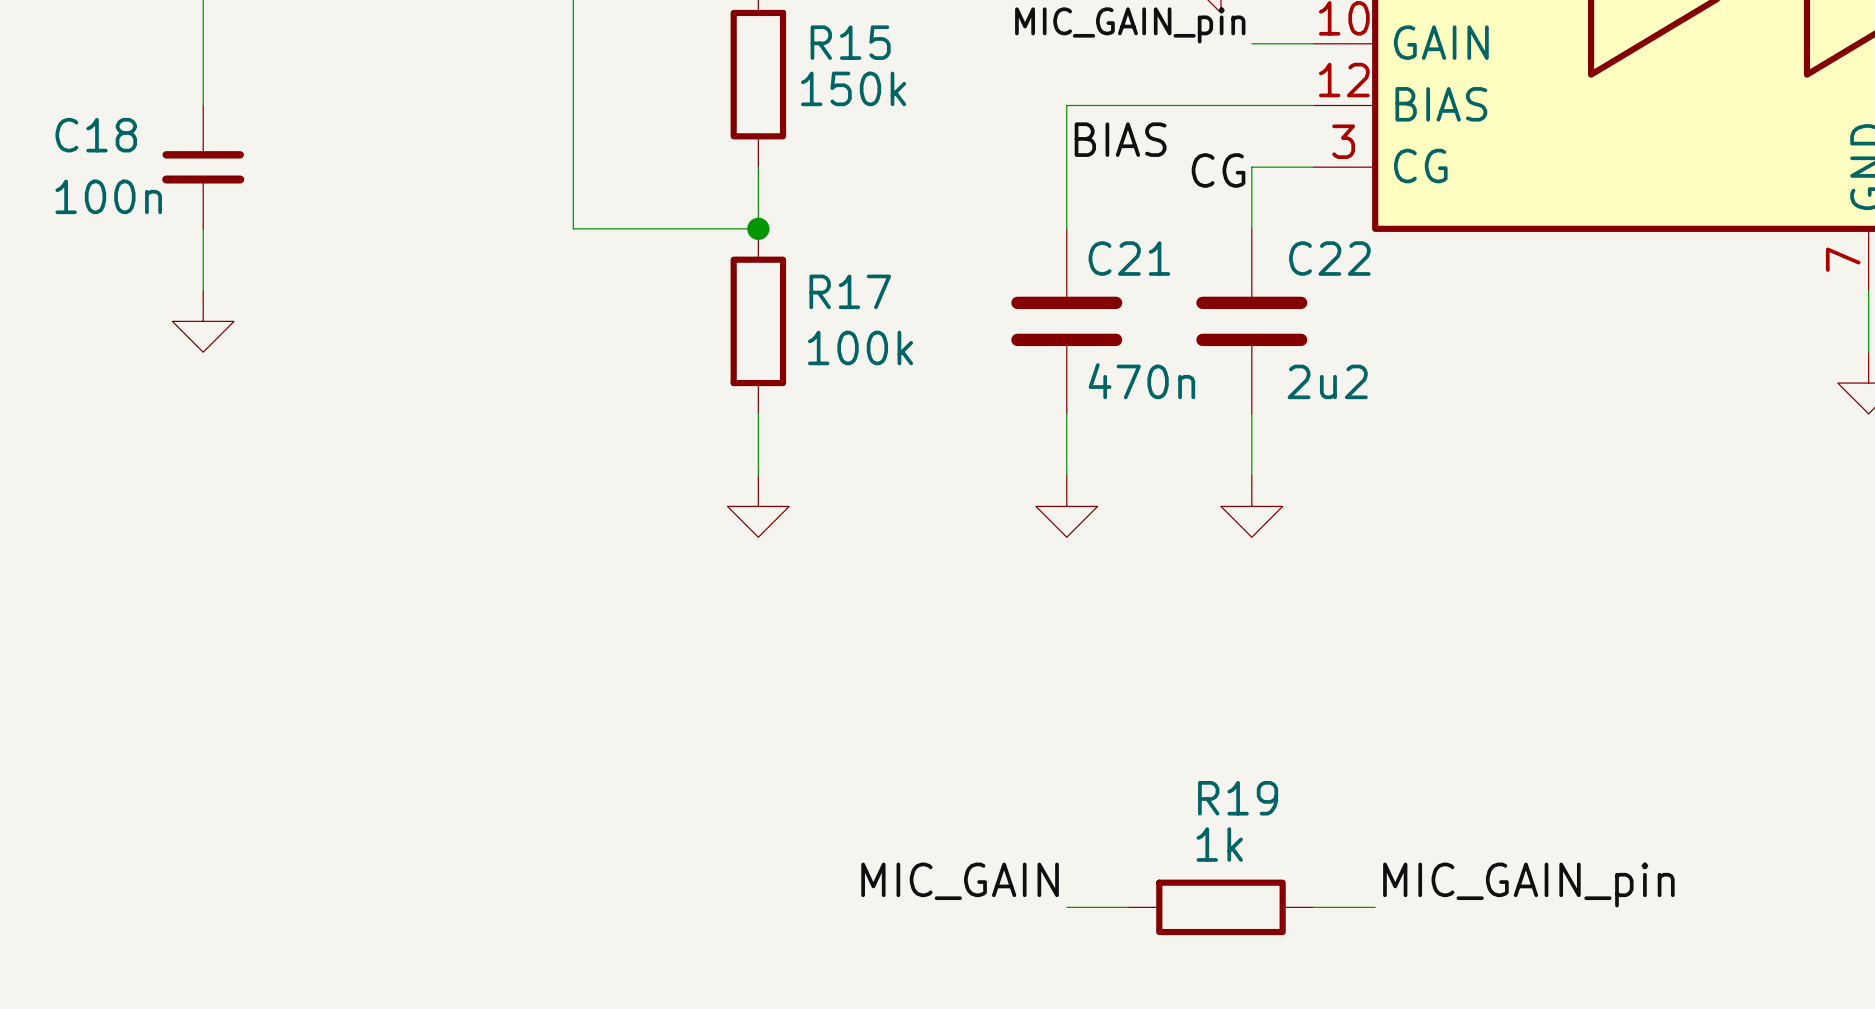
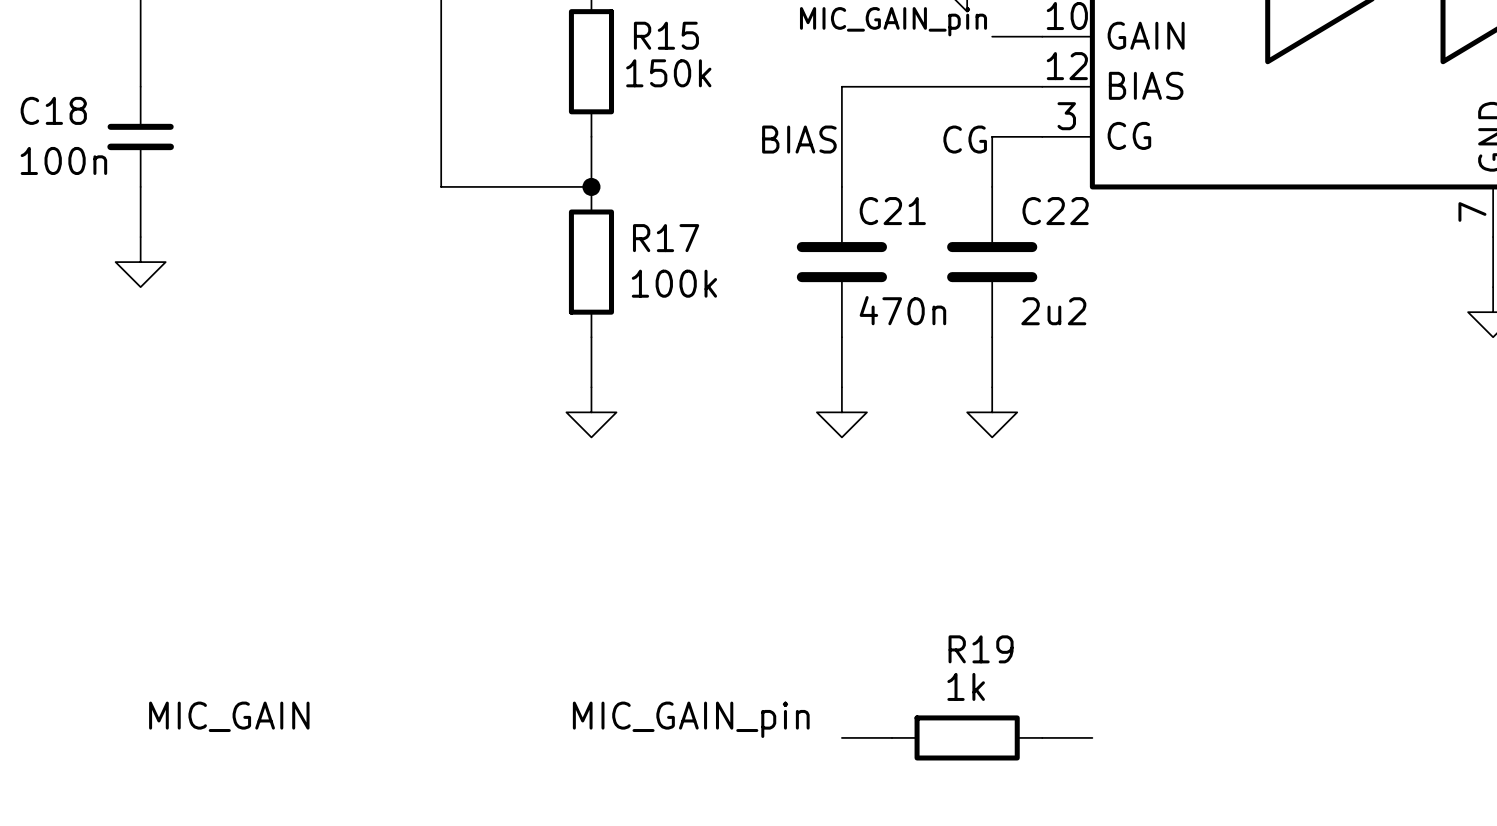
label position: BIAS (1120, 139) -> BIAS (799, 139)
label: none -> MIC_GAIN (229, 716)
label: MIC_GAIN (960, 881) -> MIC_GAIN_pin (691, 719)
label: MIC_GAIN_pin (1528, 884) -> none

